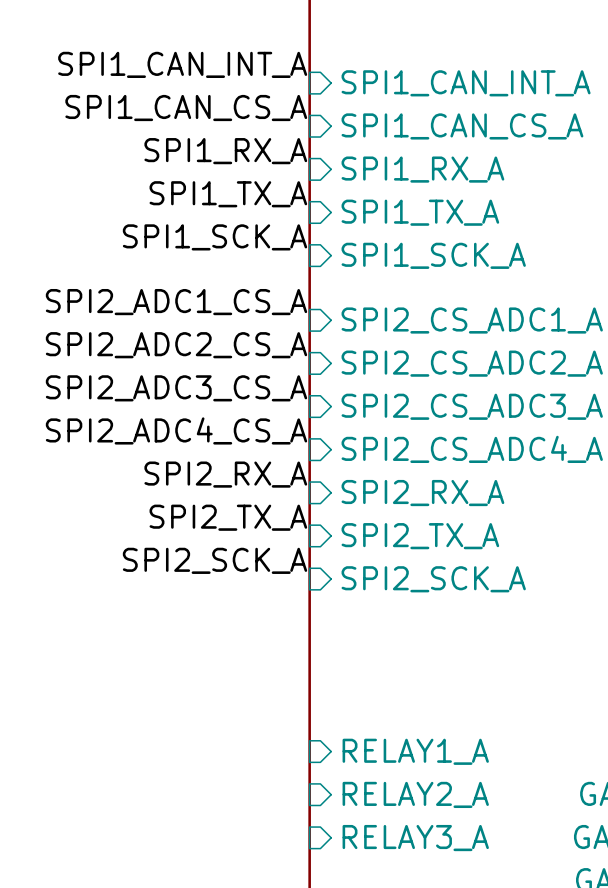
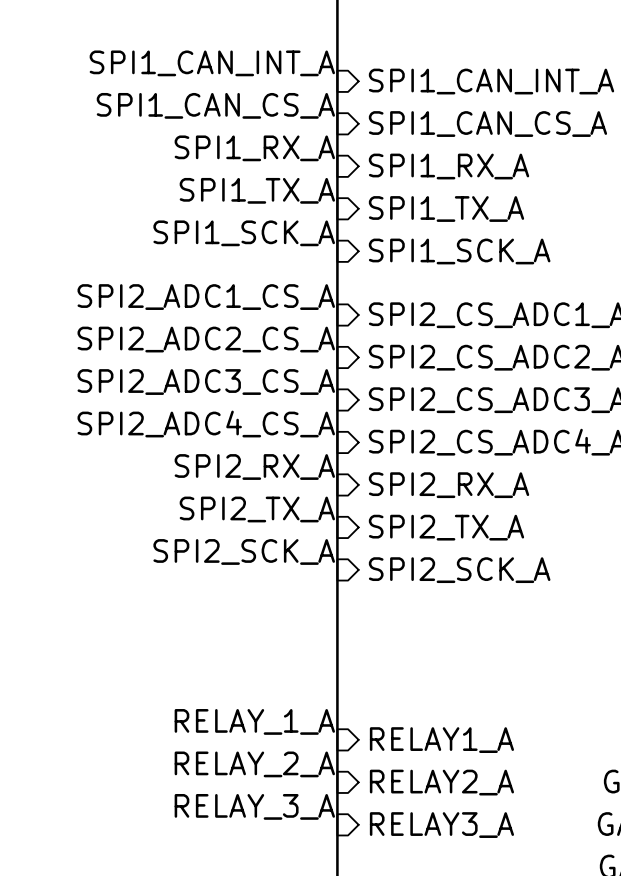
label: none -> RELAY_1_A (254, 721)
label: none -> RELAY_2_A (254, 764)
label: none -> RELAY_3_A (254, 806)

